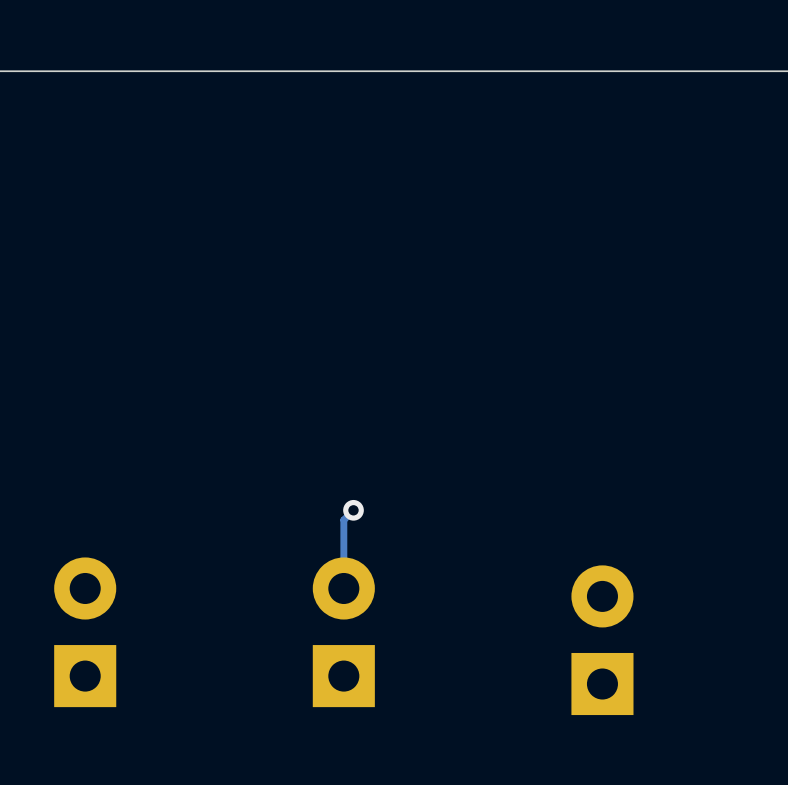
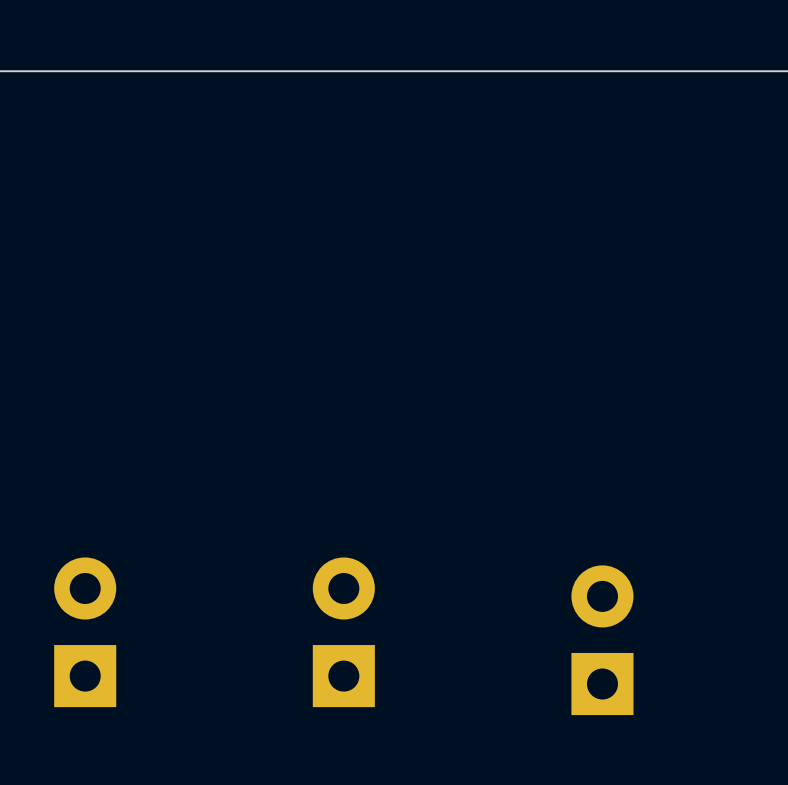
track: (353, 510) (343, 519) (343, 588) -> none
via: (353, 510) -> none

